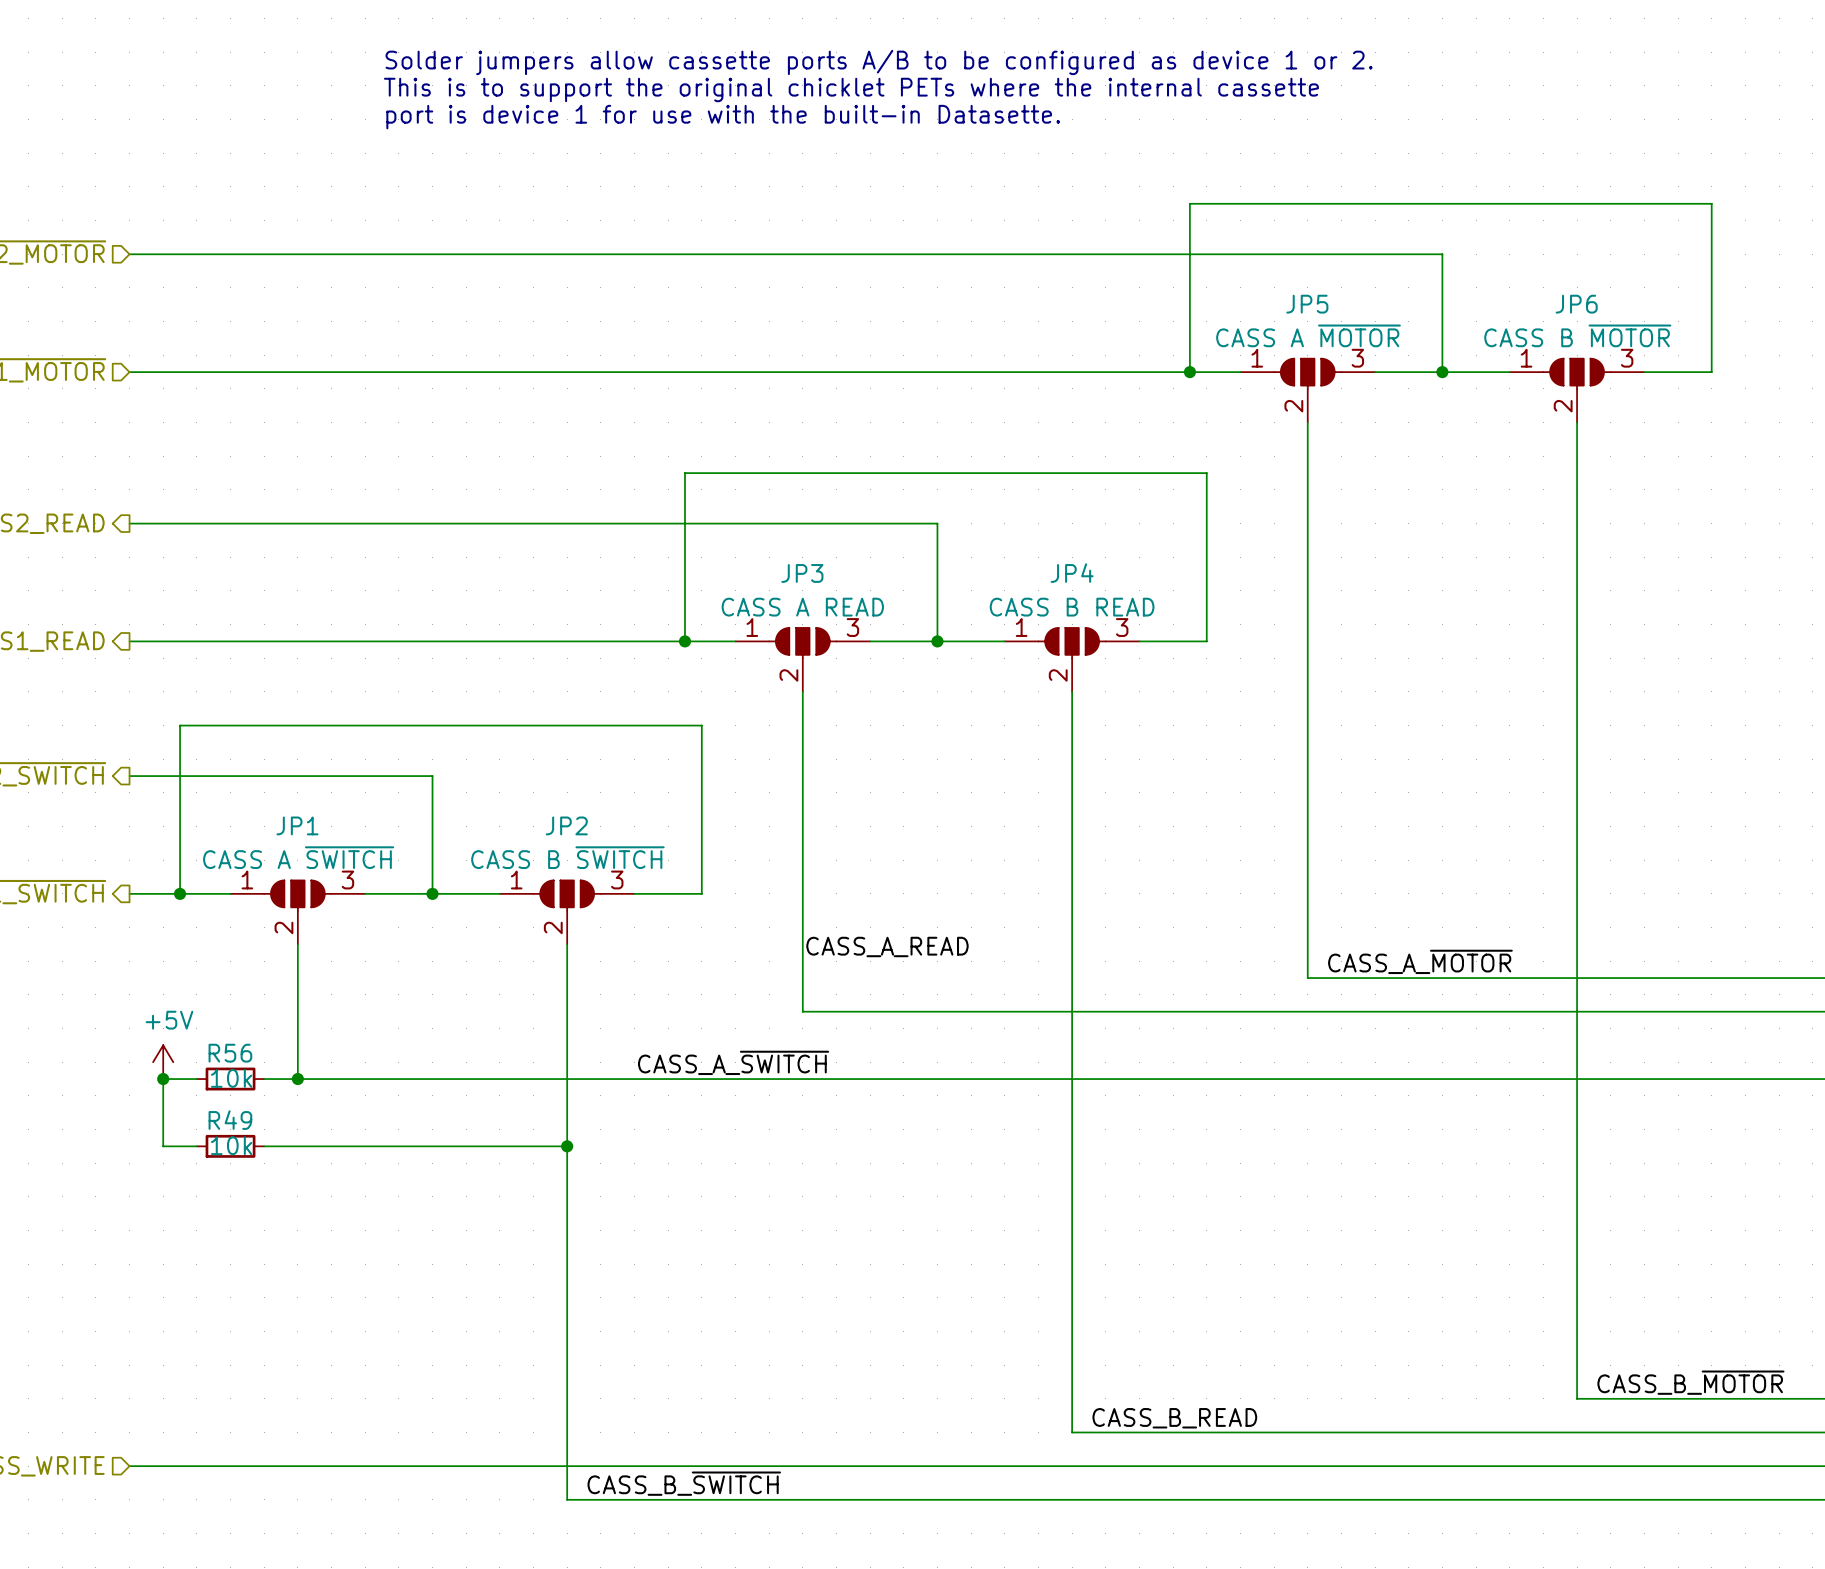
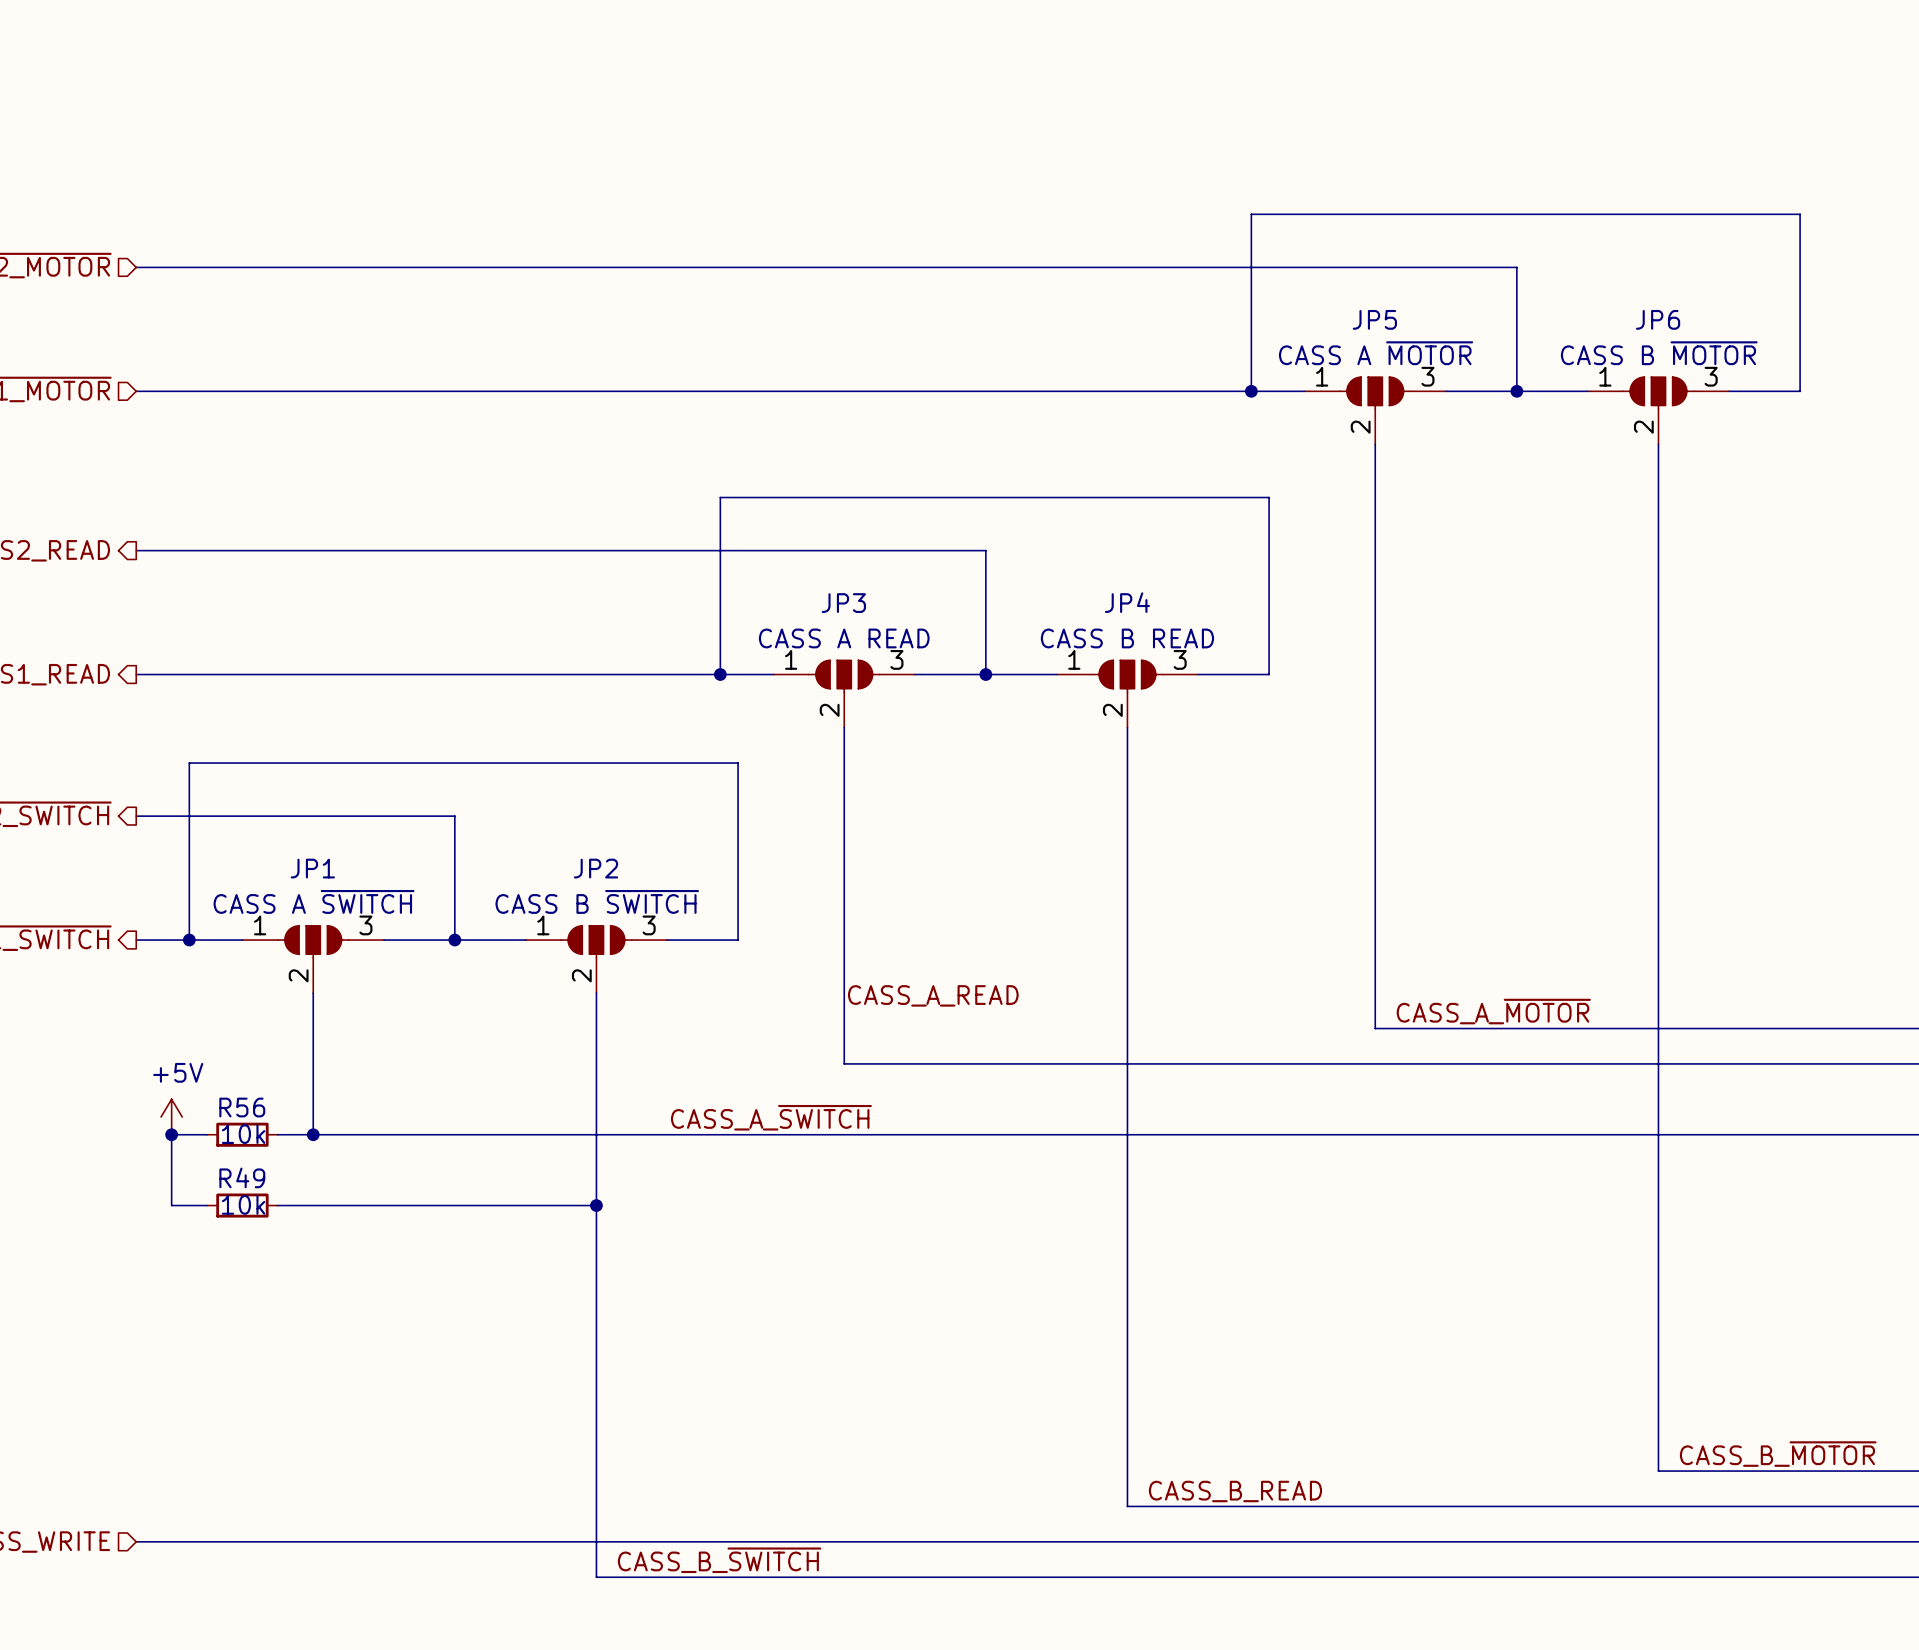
text: Solder jumpers allow cassette ports A/B to be configured as device 1 or 2. (879, 62) -> none
text: This is to support the original chicklet PETs where the internal cassette (851, 89) -> none
text: port is device 1 for use with the built-in Datasette. (723, 117) -> none

